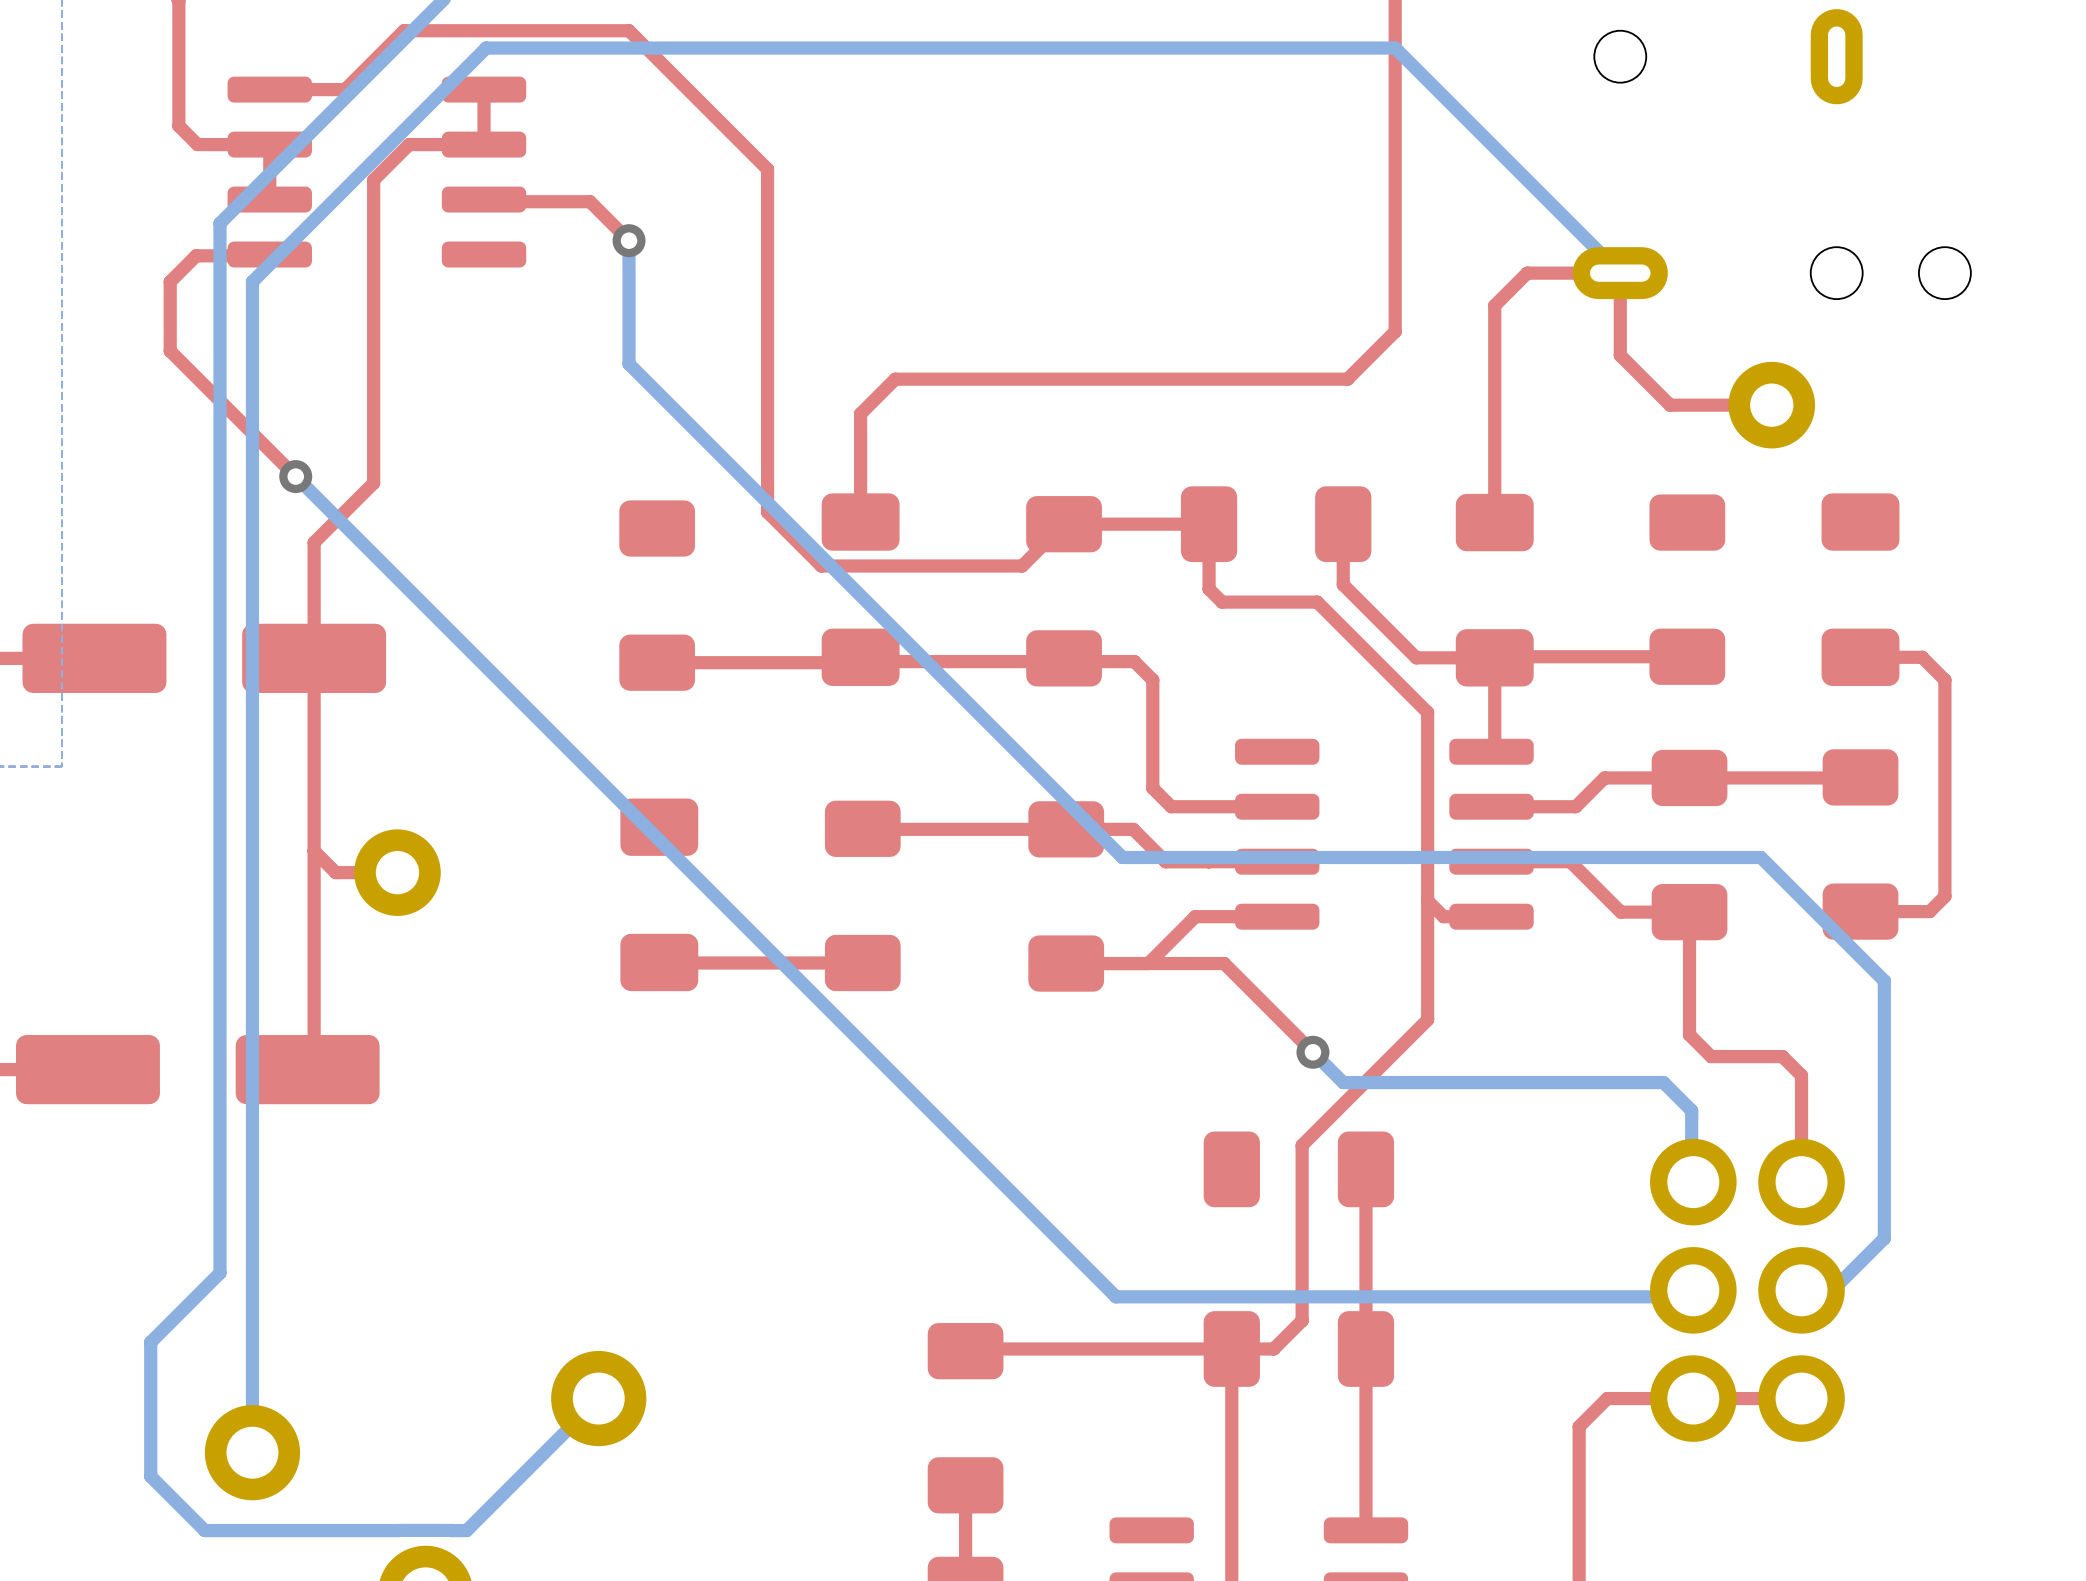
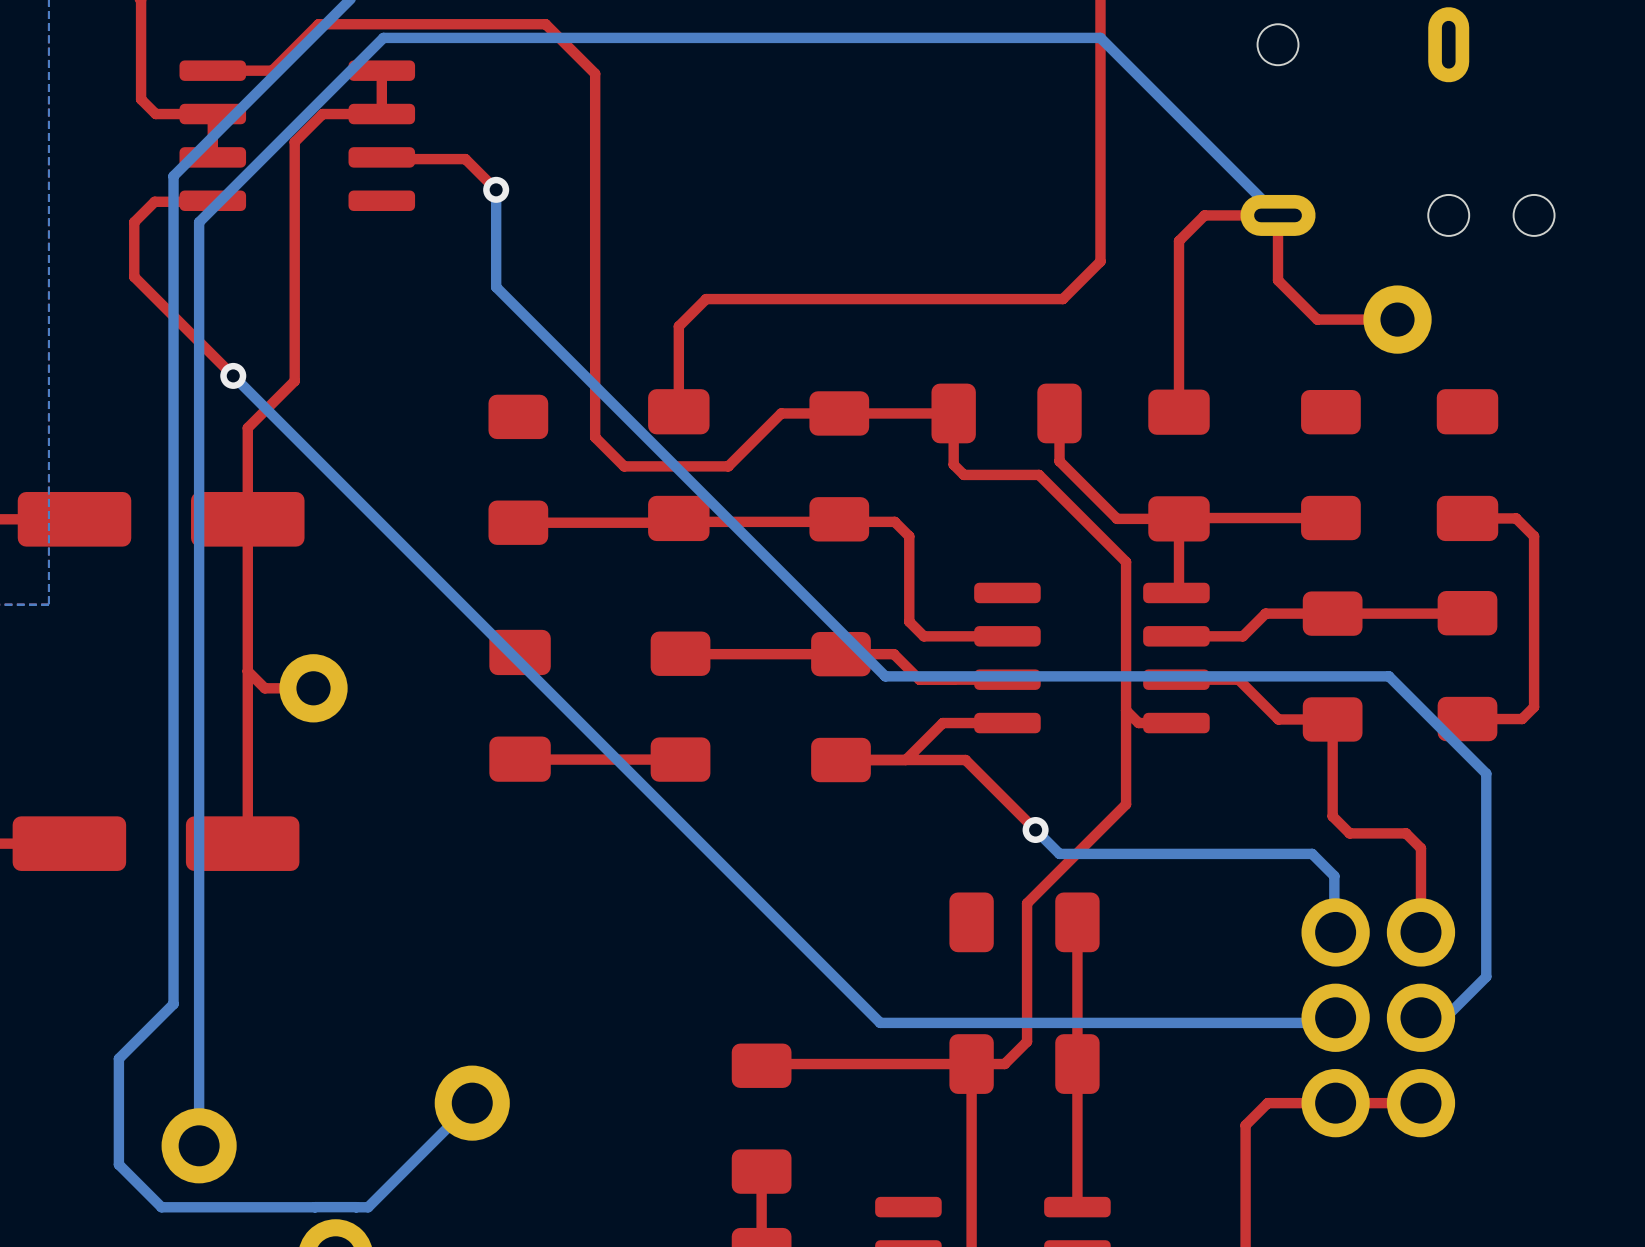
top track: (629, 30) (767, 169) (767, 512) (821, 566) (1022, 566) (1064, 524) -> (496, 24) (545, 24) (595, 73) (595, 437) (624, 466) (728, 466) (781, 413) (839, 413)

